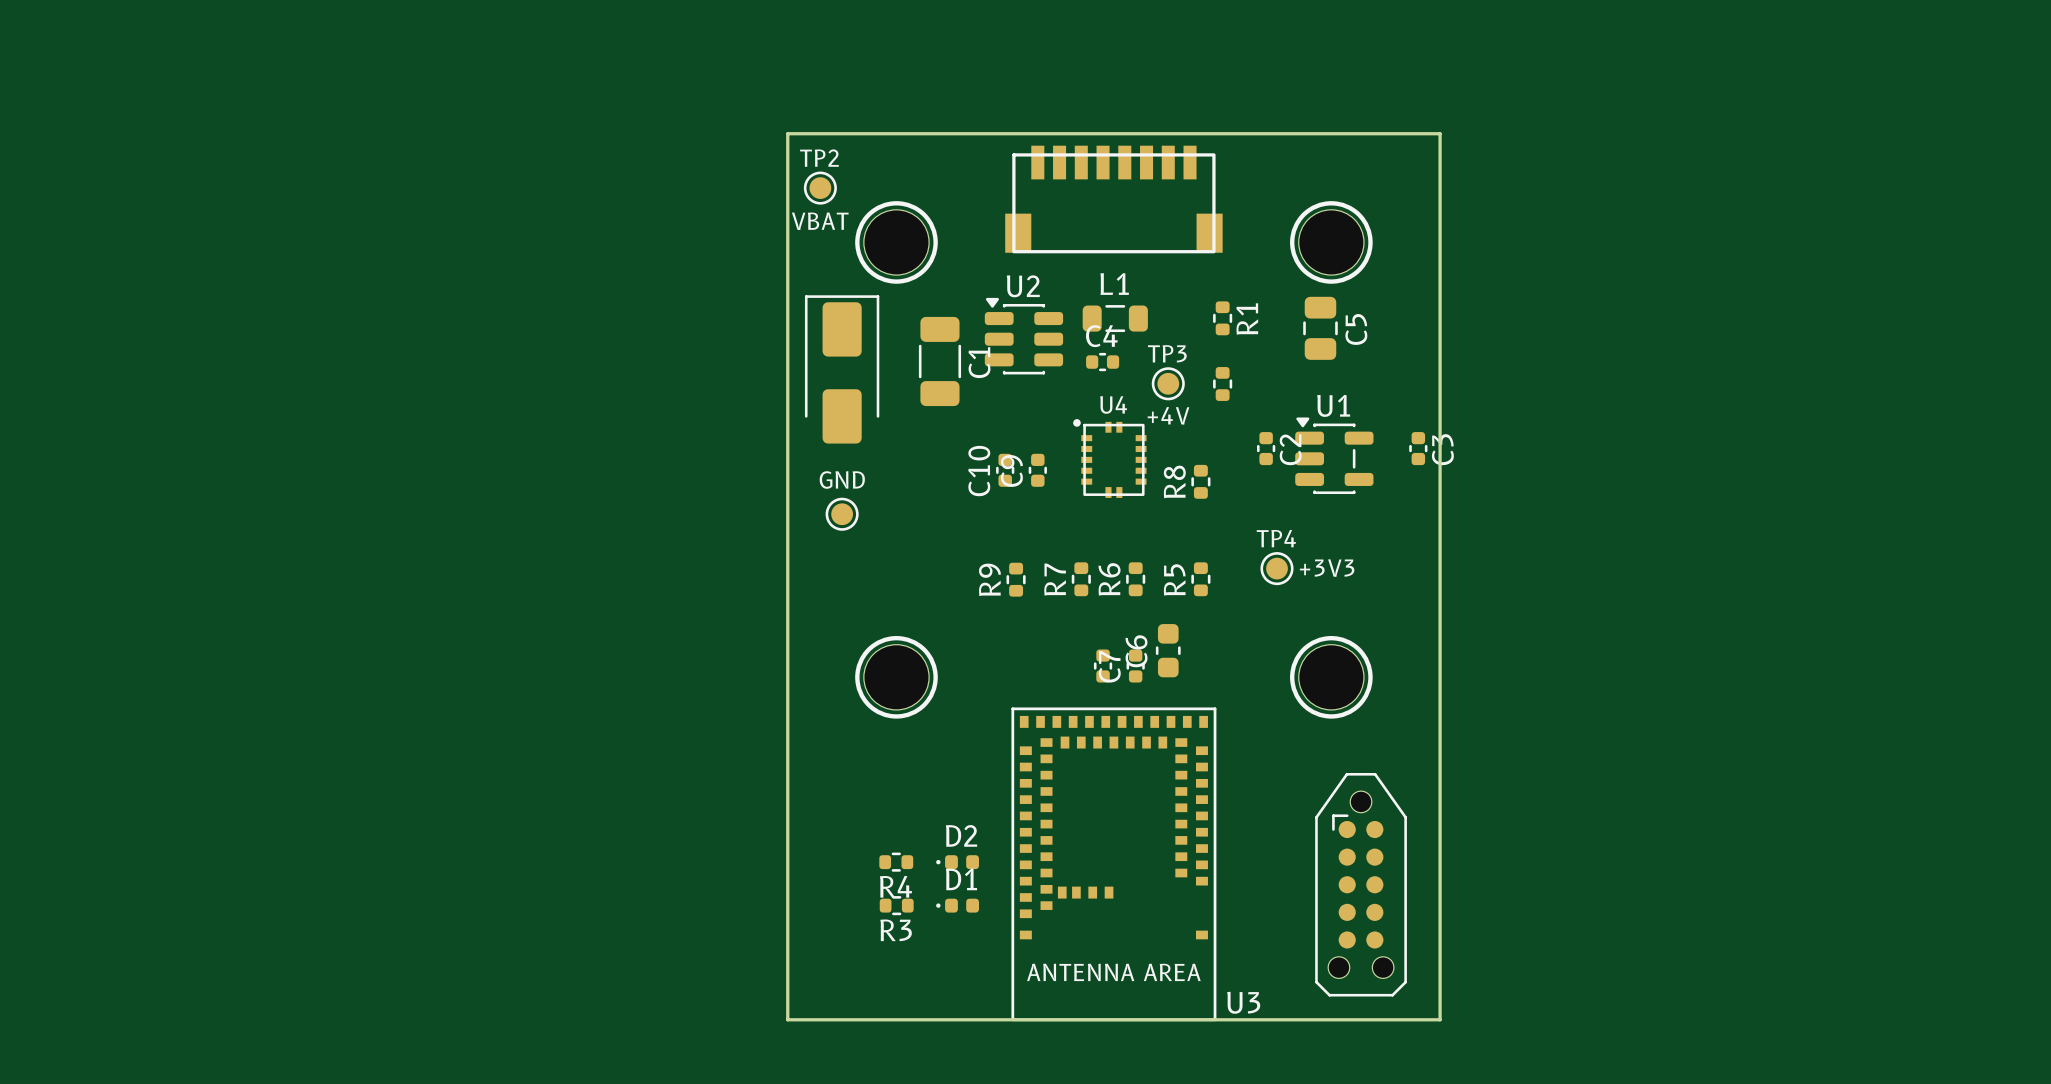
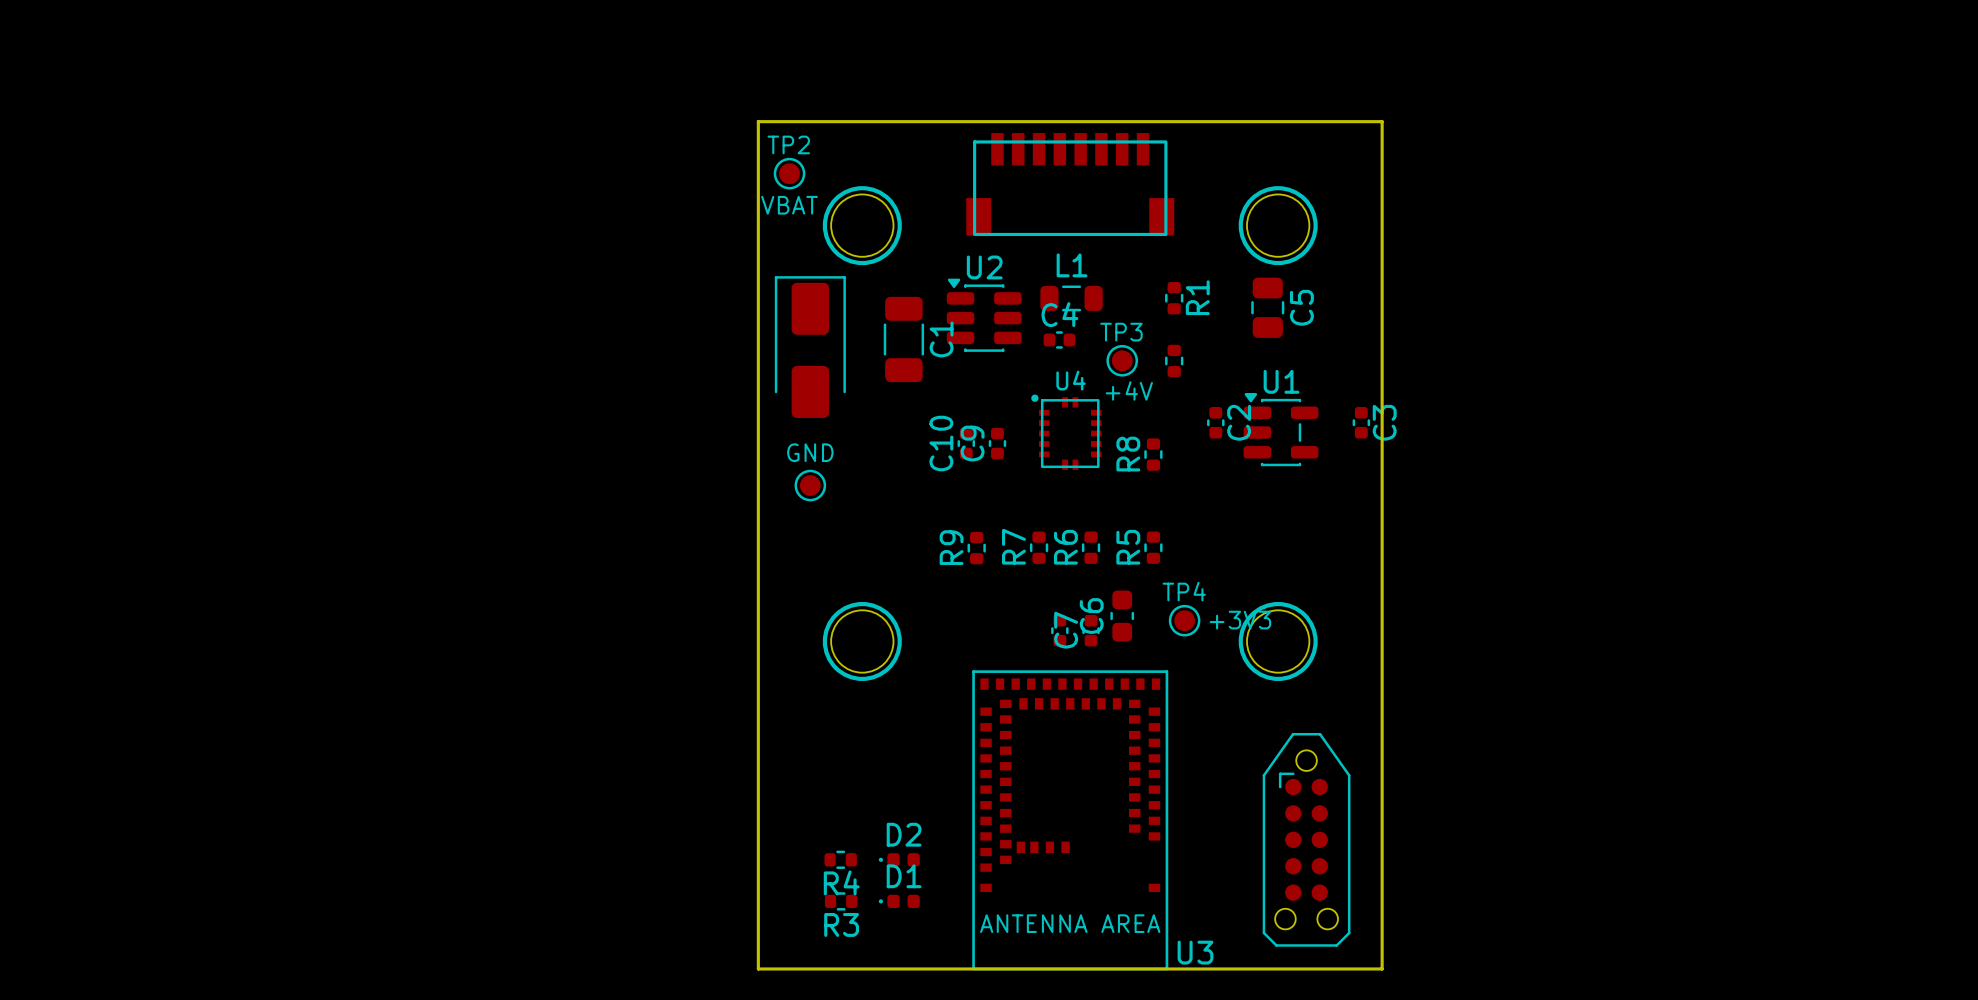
TP4 position: (1277, 568) -> (1184, 620)
R4 position: (896, 862) -> (840, 859)
D2 position: (957, 862) -> (899, 859)
R3 position: (896, 905) -> (841, 901)
D1 position: (957, 905) -> (899, 901)

